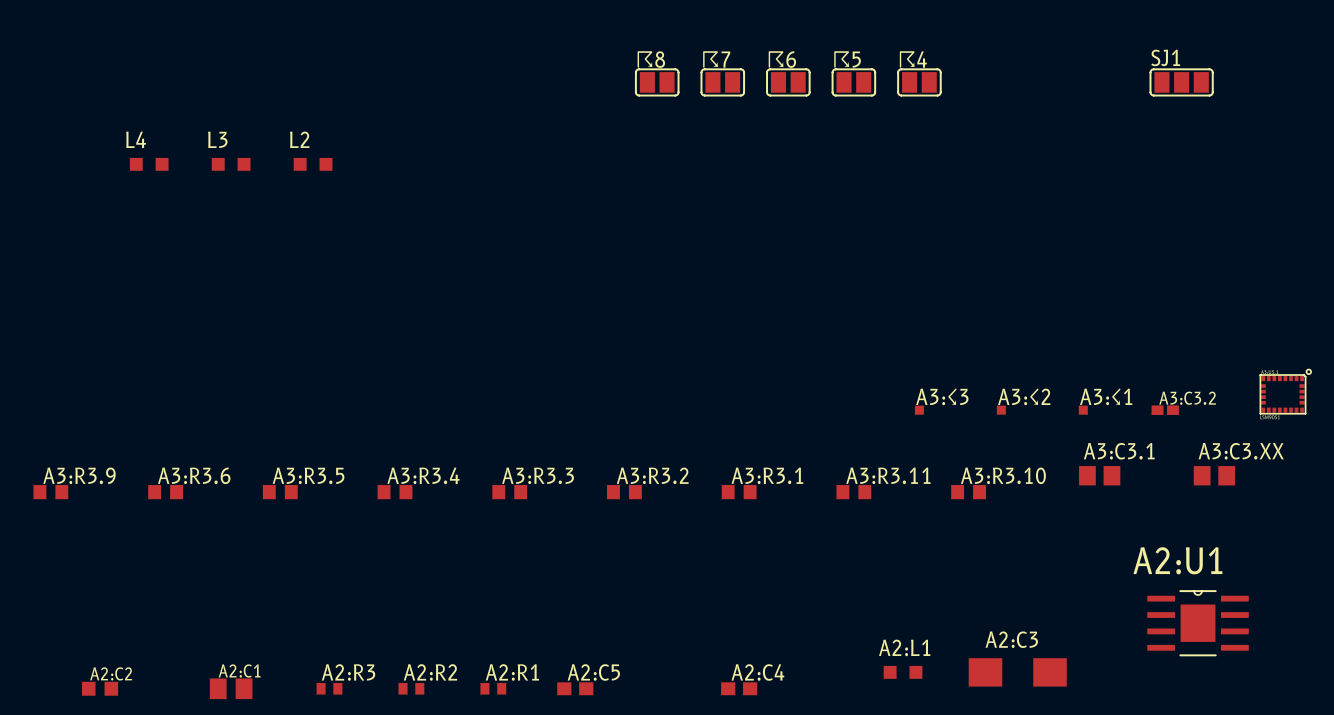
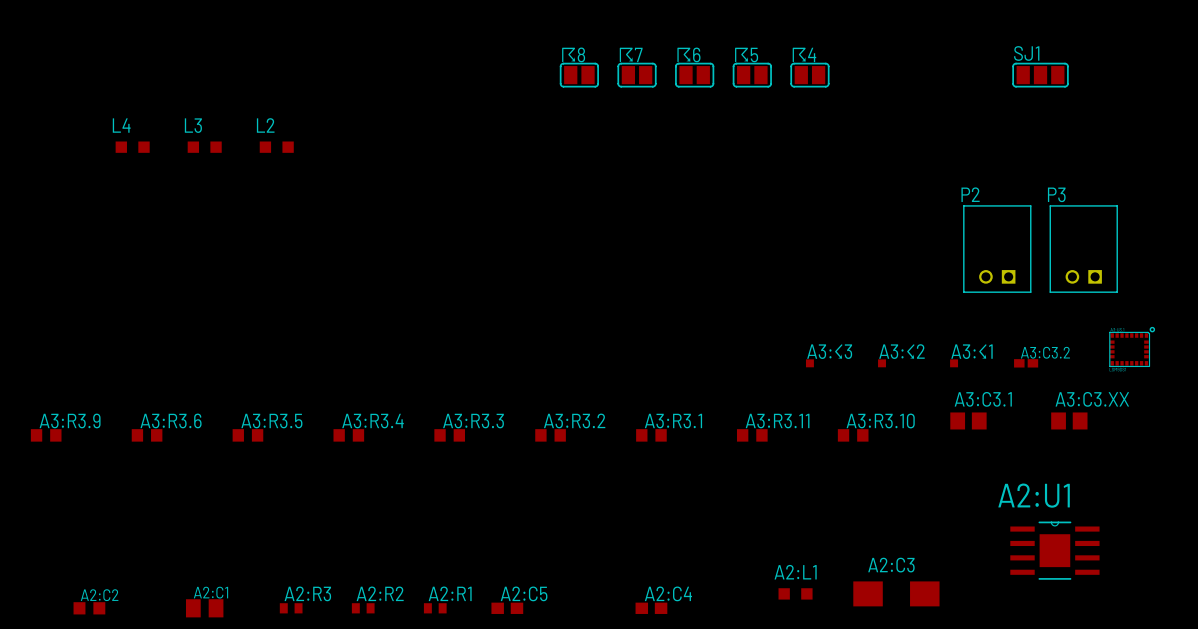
P2: none -> (997, 249)
P3: none -> (1083, 249)

